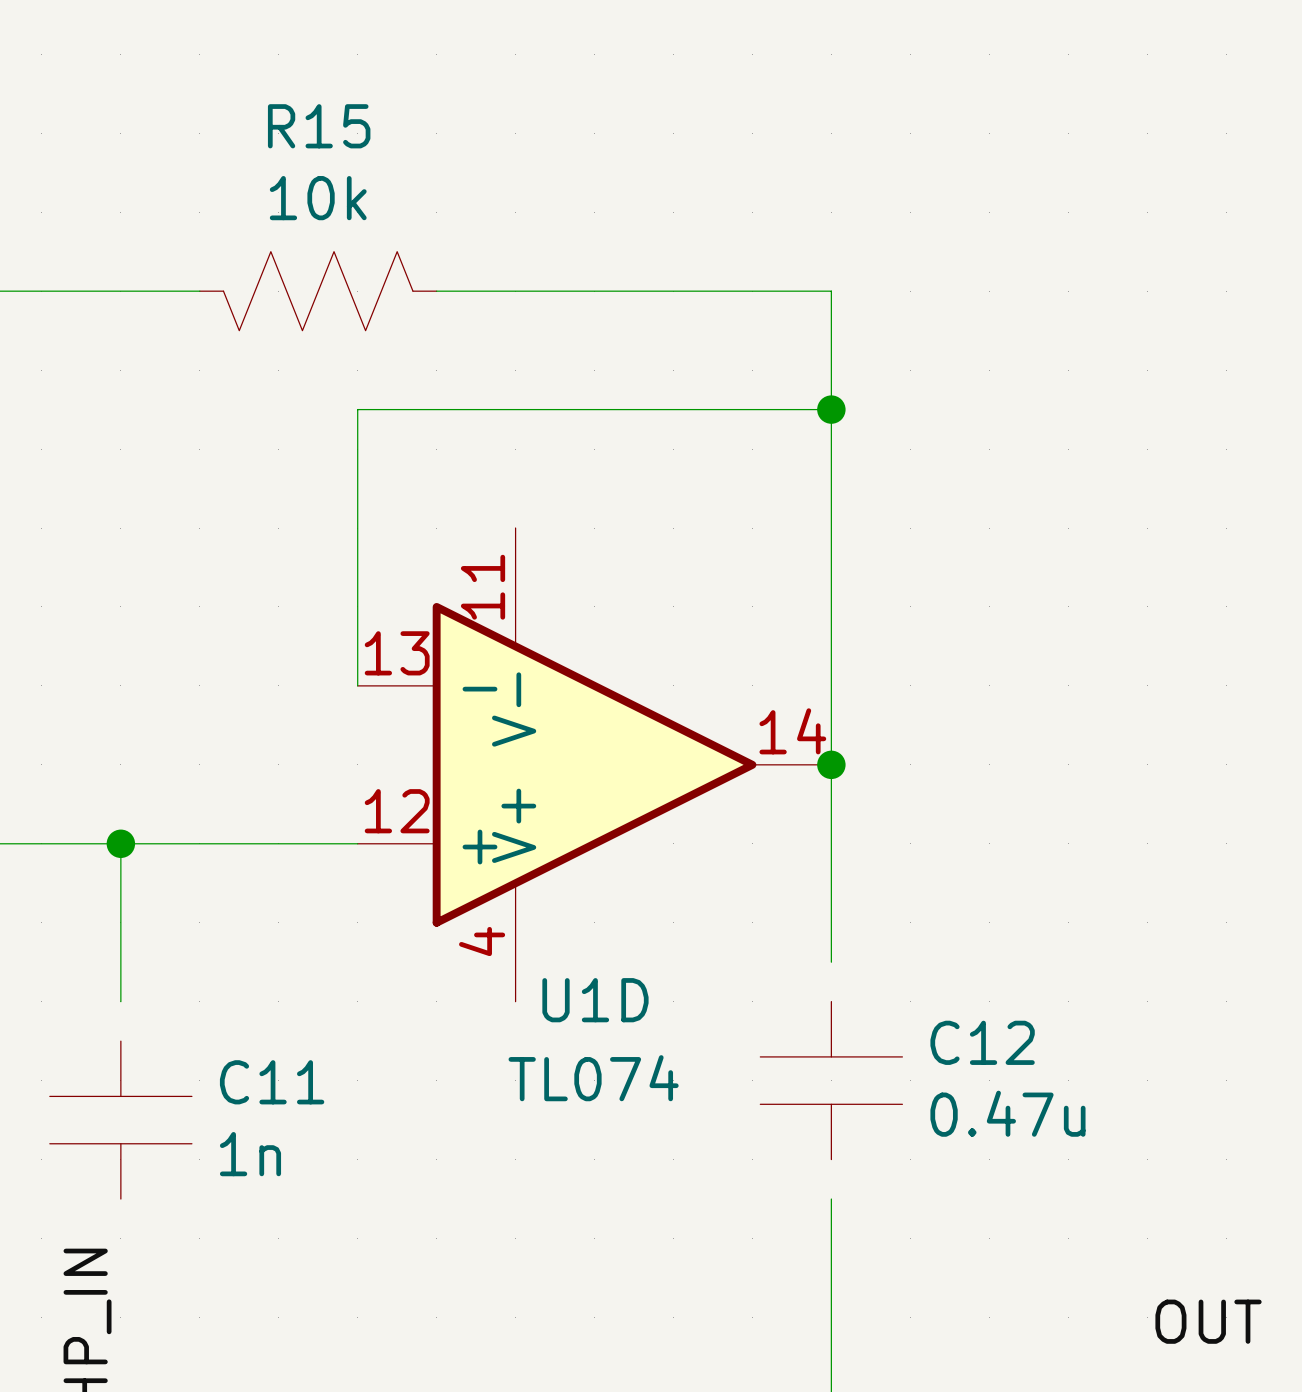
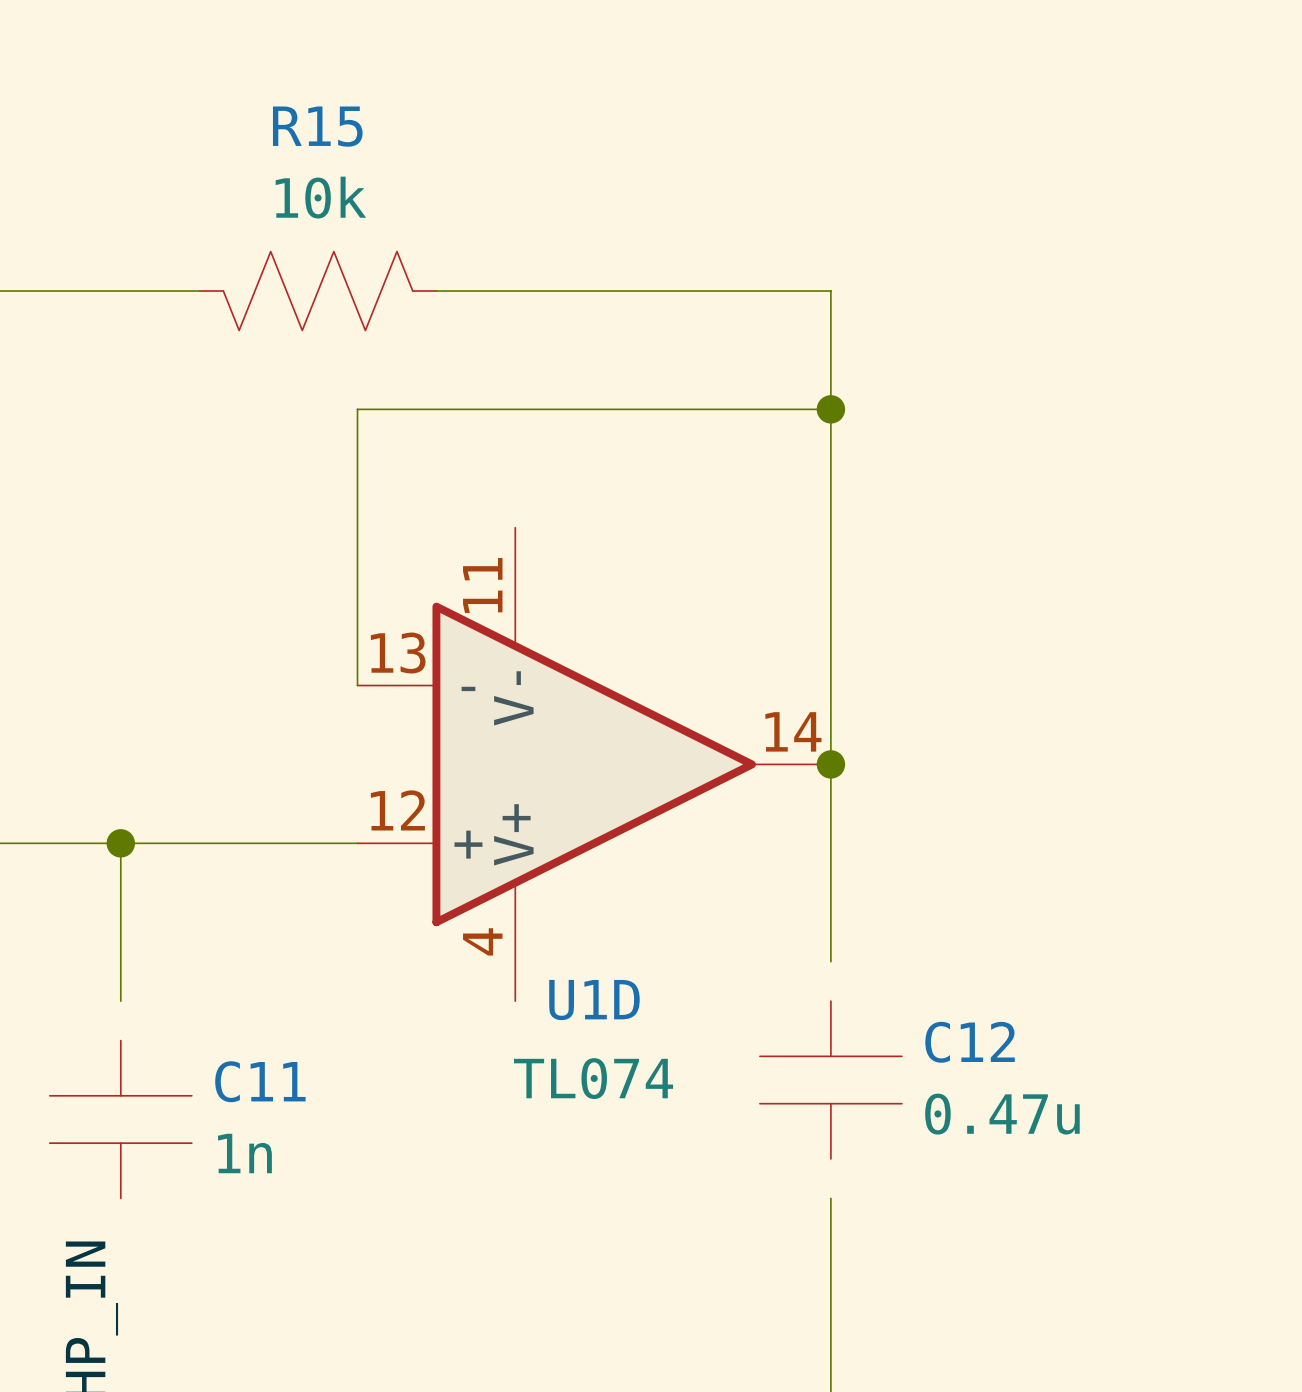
label: OUT (1208, 1321) -> none

